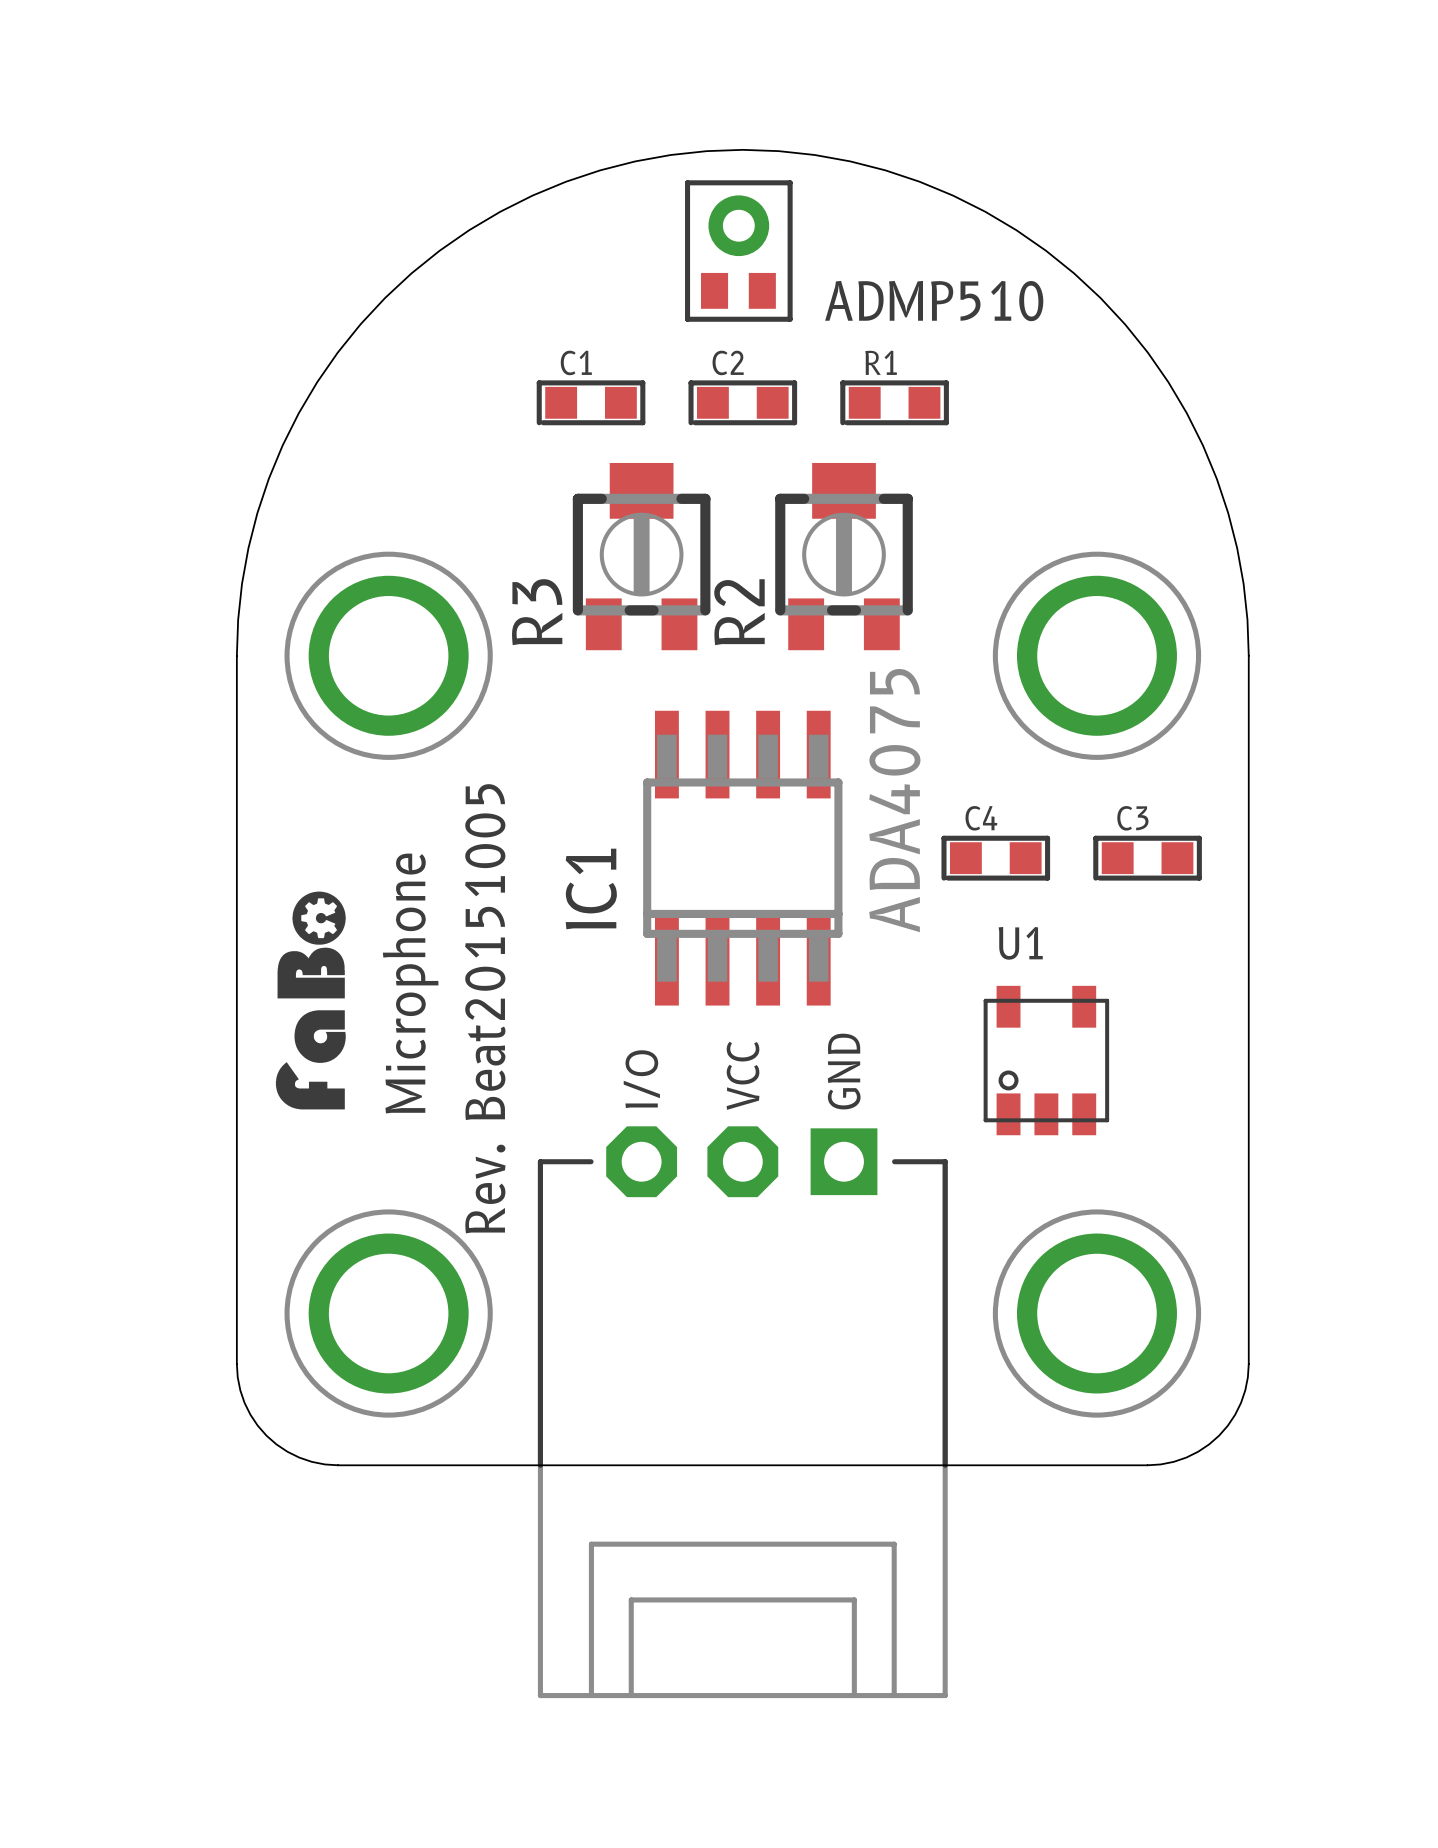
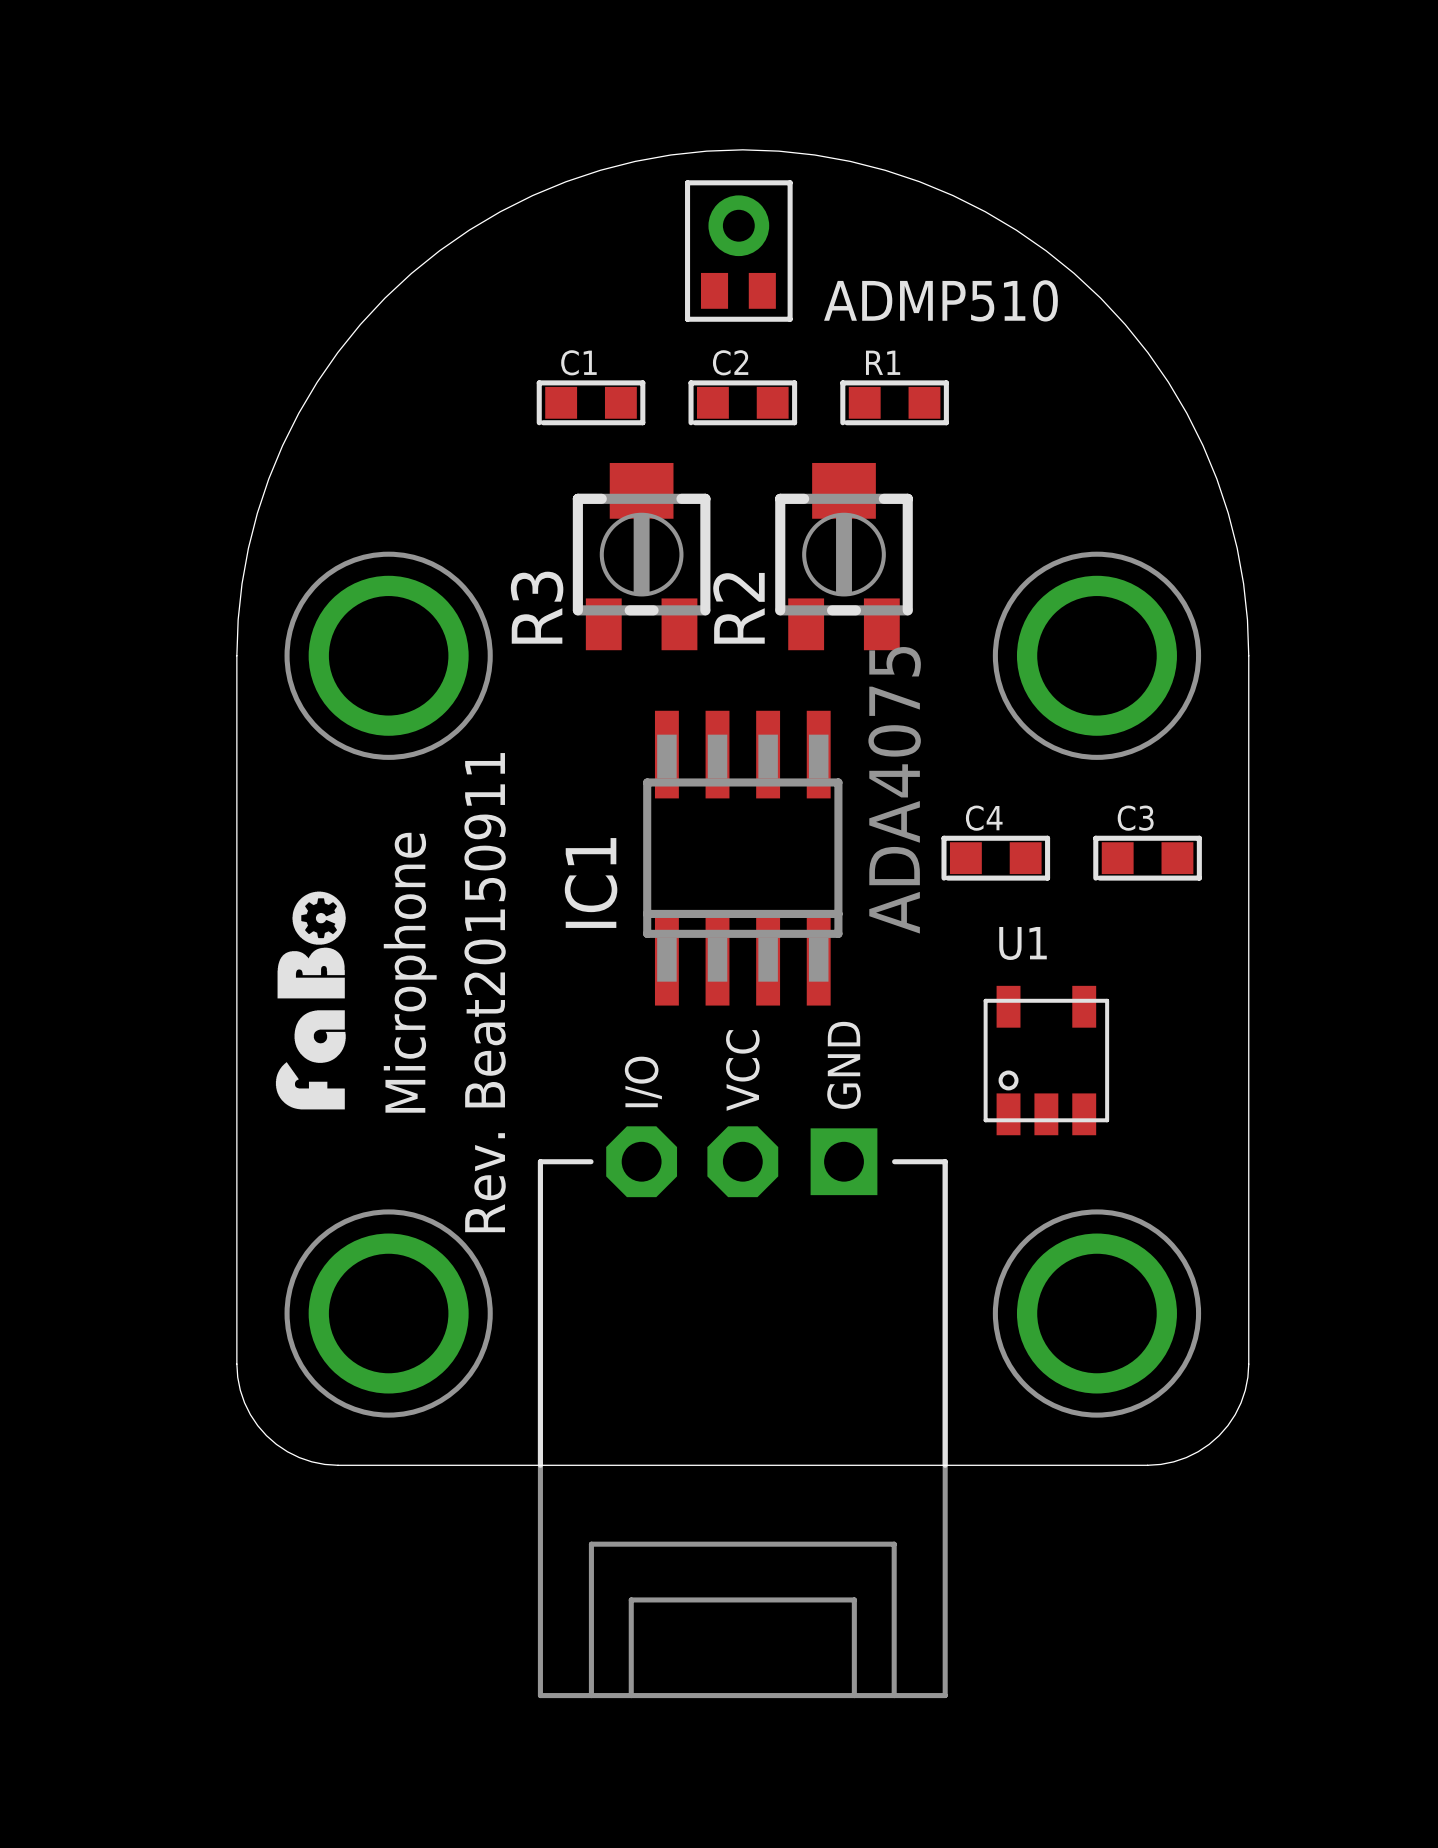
text: Rev. Beat20151005 (485, 1008) -> Rev. Beat20150911 (485, 992)

